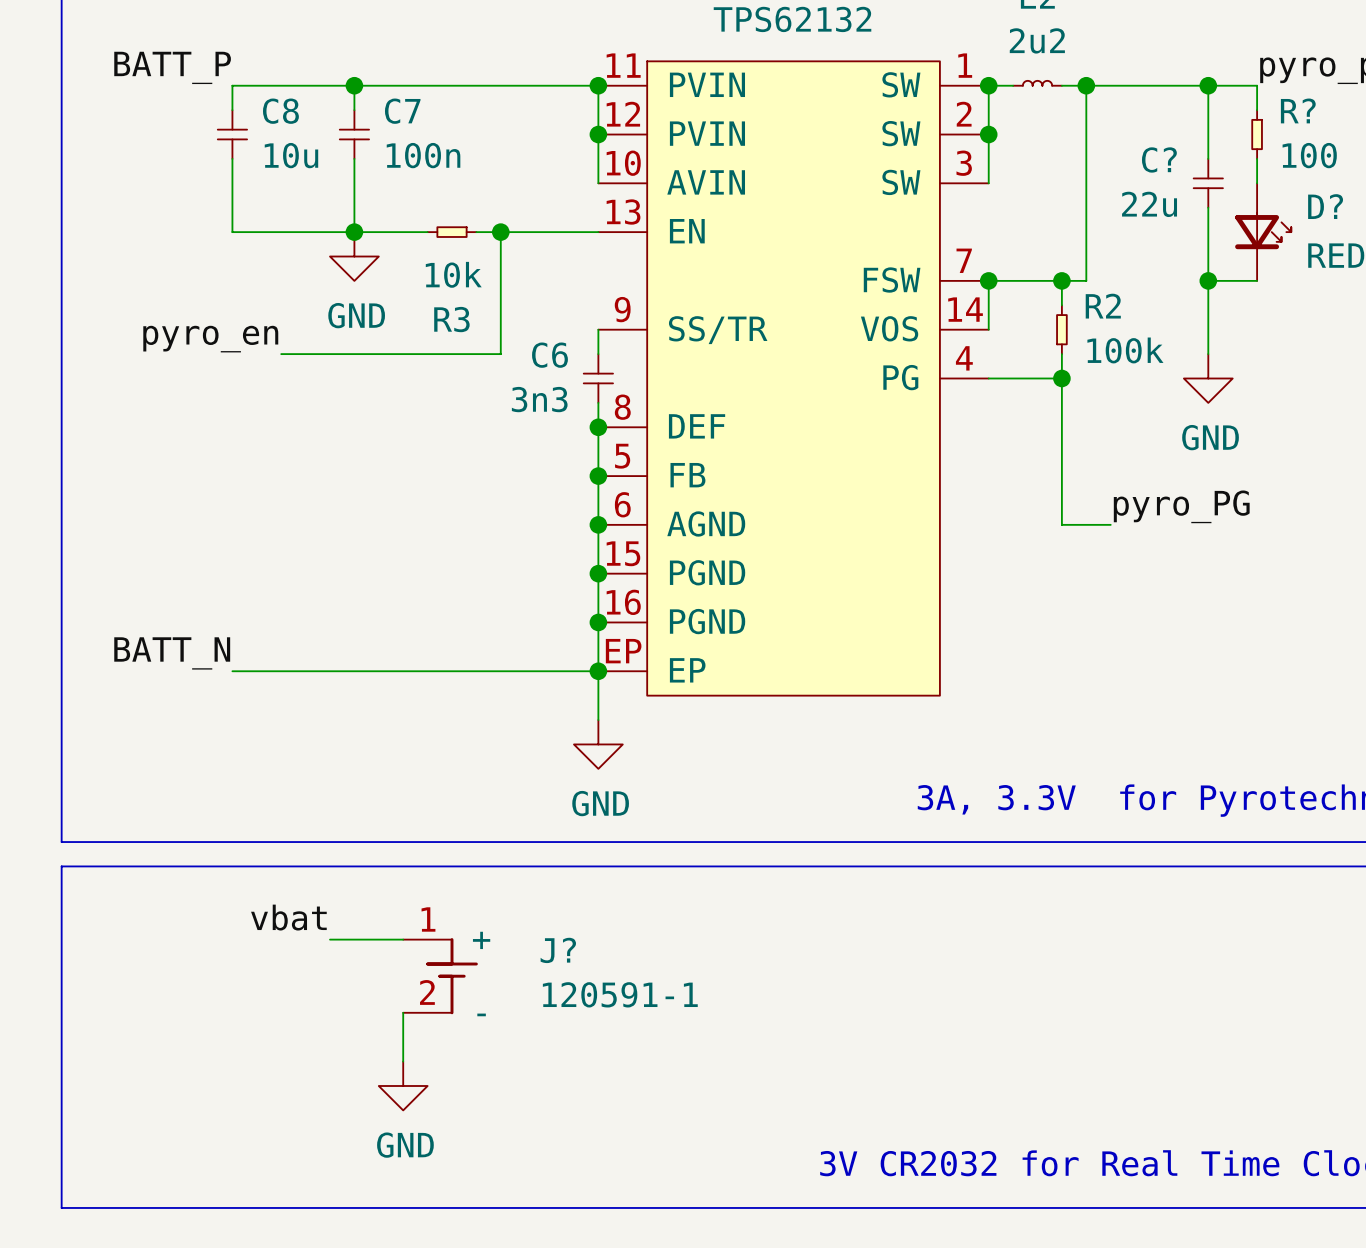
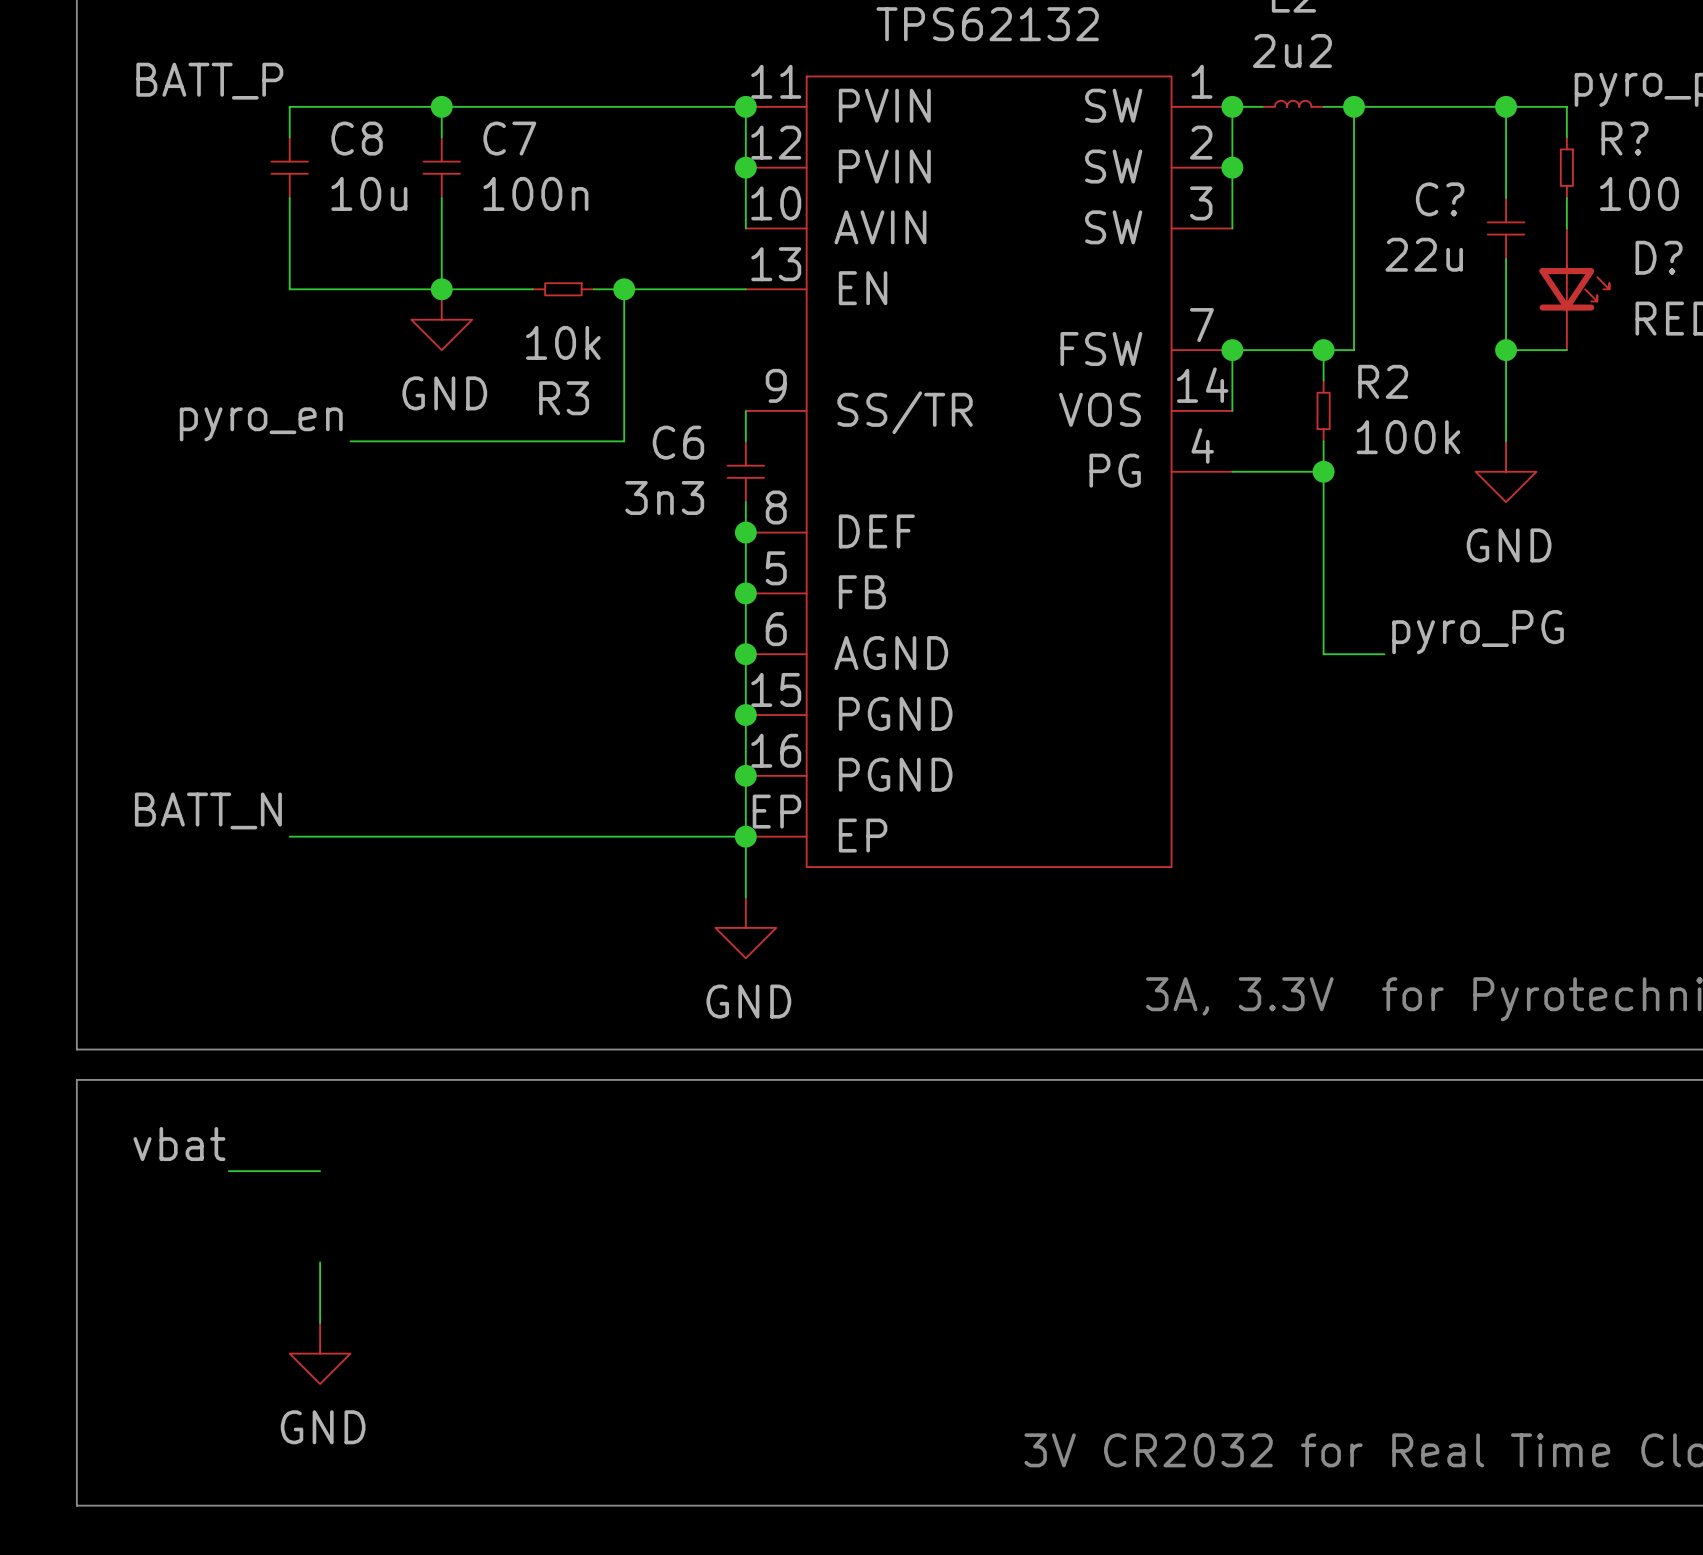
label position: vbat (288, 917) -> vbat (179, 1144)
wire: (330, 939) (403, 939) -> (228, 1171) (320, 1171)
J?: 120591-1 (440, 976) -> none
wire: (403, 1012) (403, 1061) -> (320, 1262) (320, 1323)
power symbol position: GND (403, 1085) -> GND (320, 1353)

